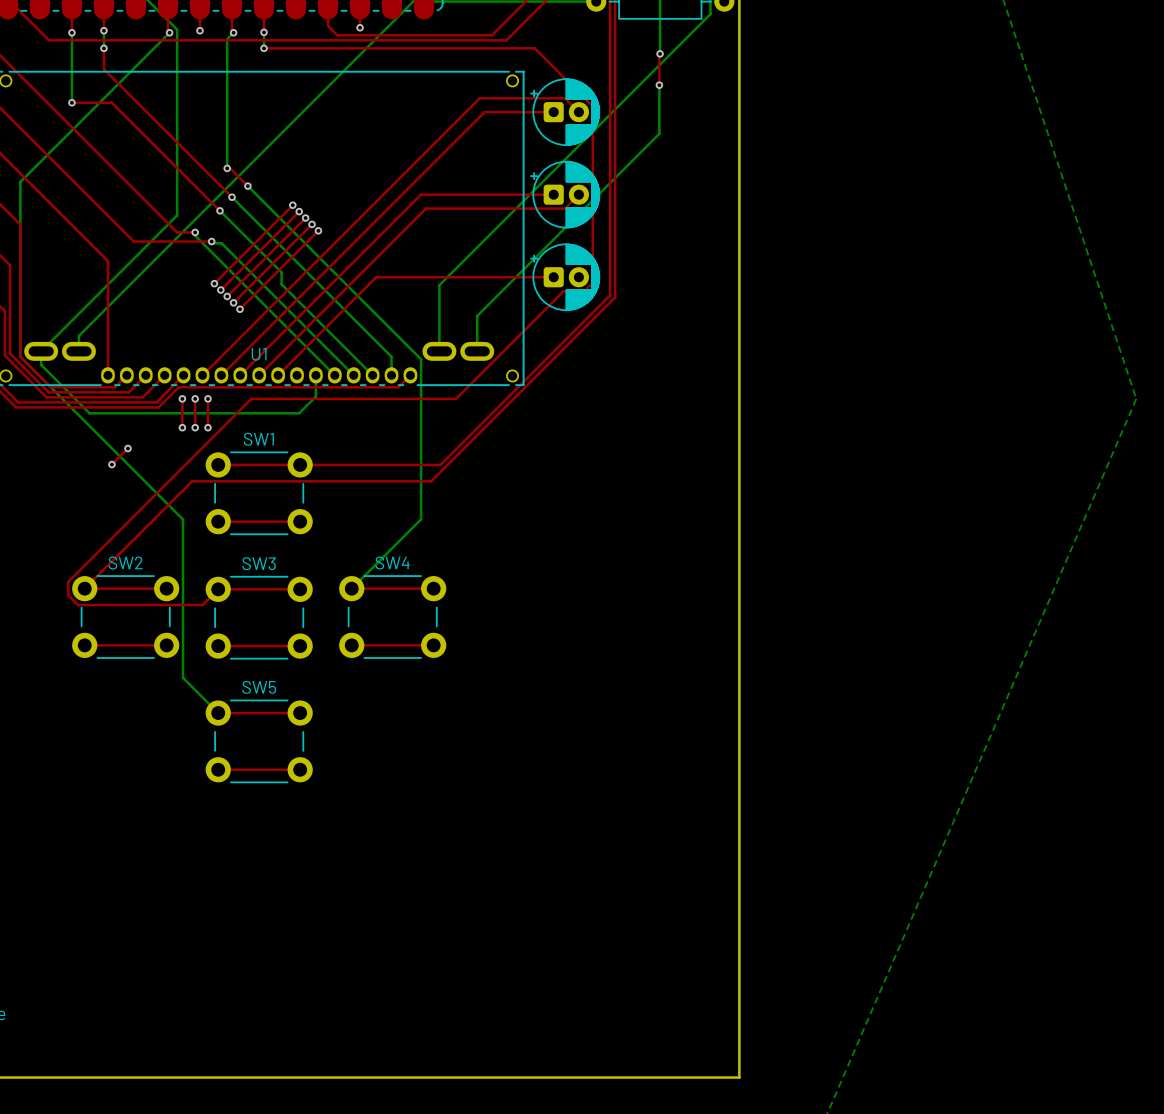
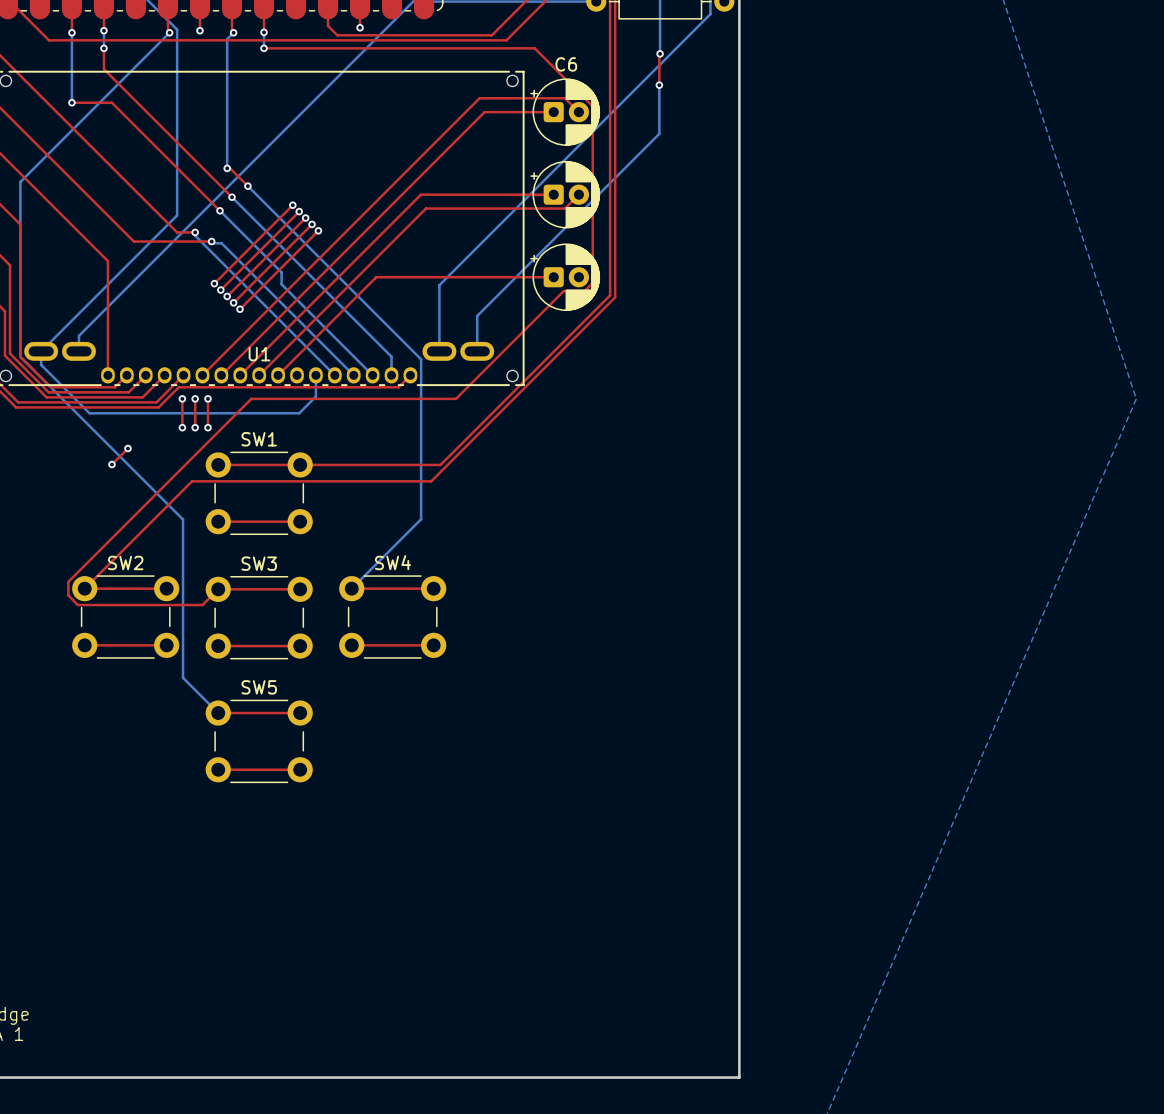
C6 name: none -> C6 (566, 64)

